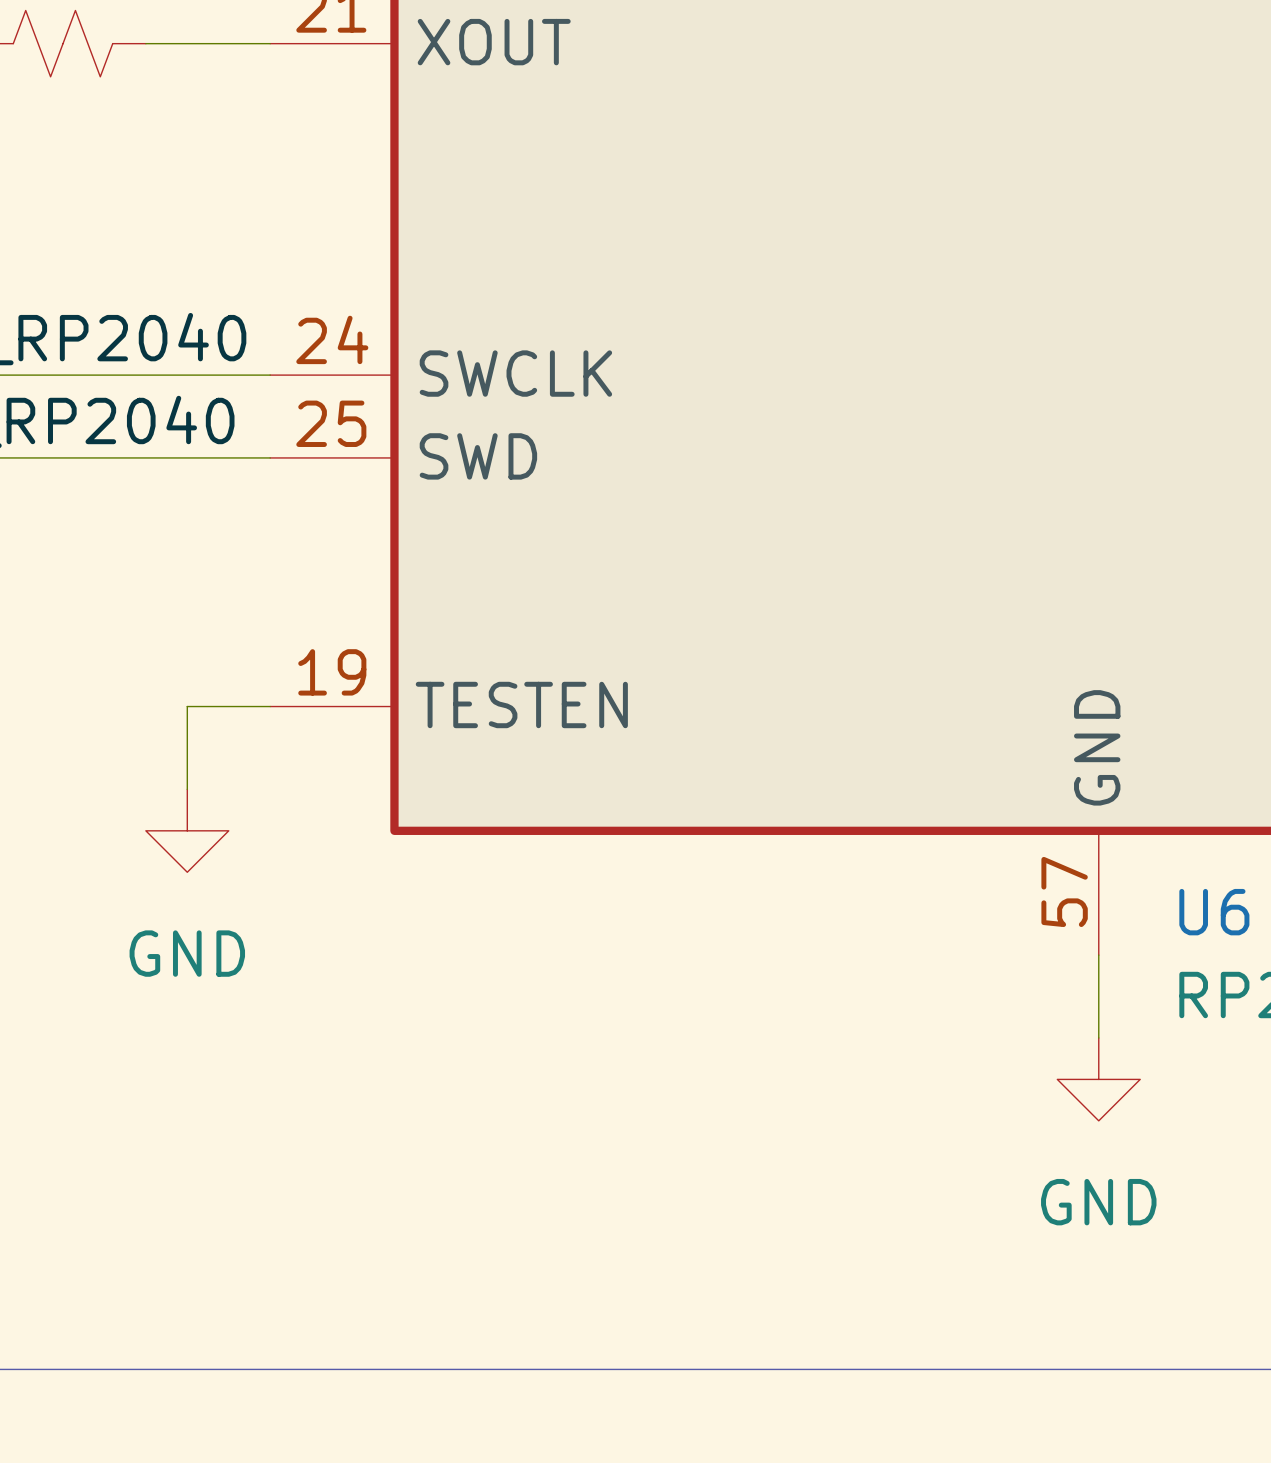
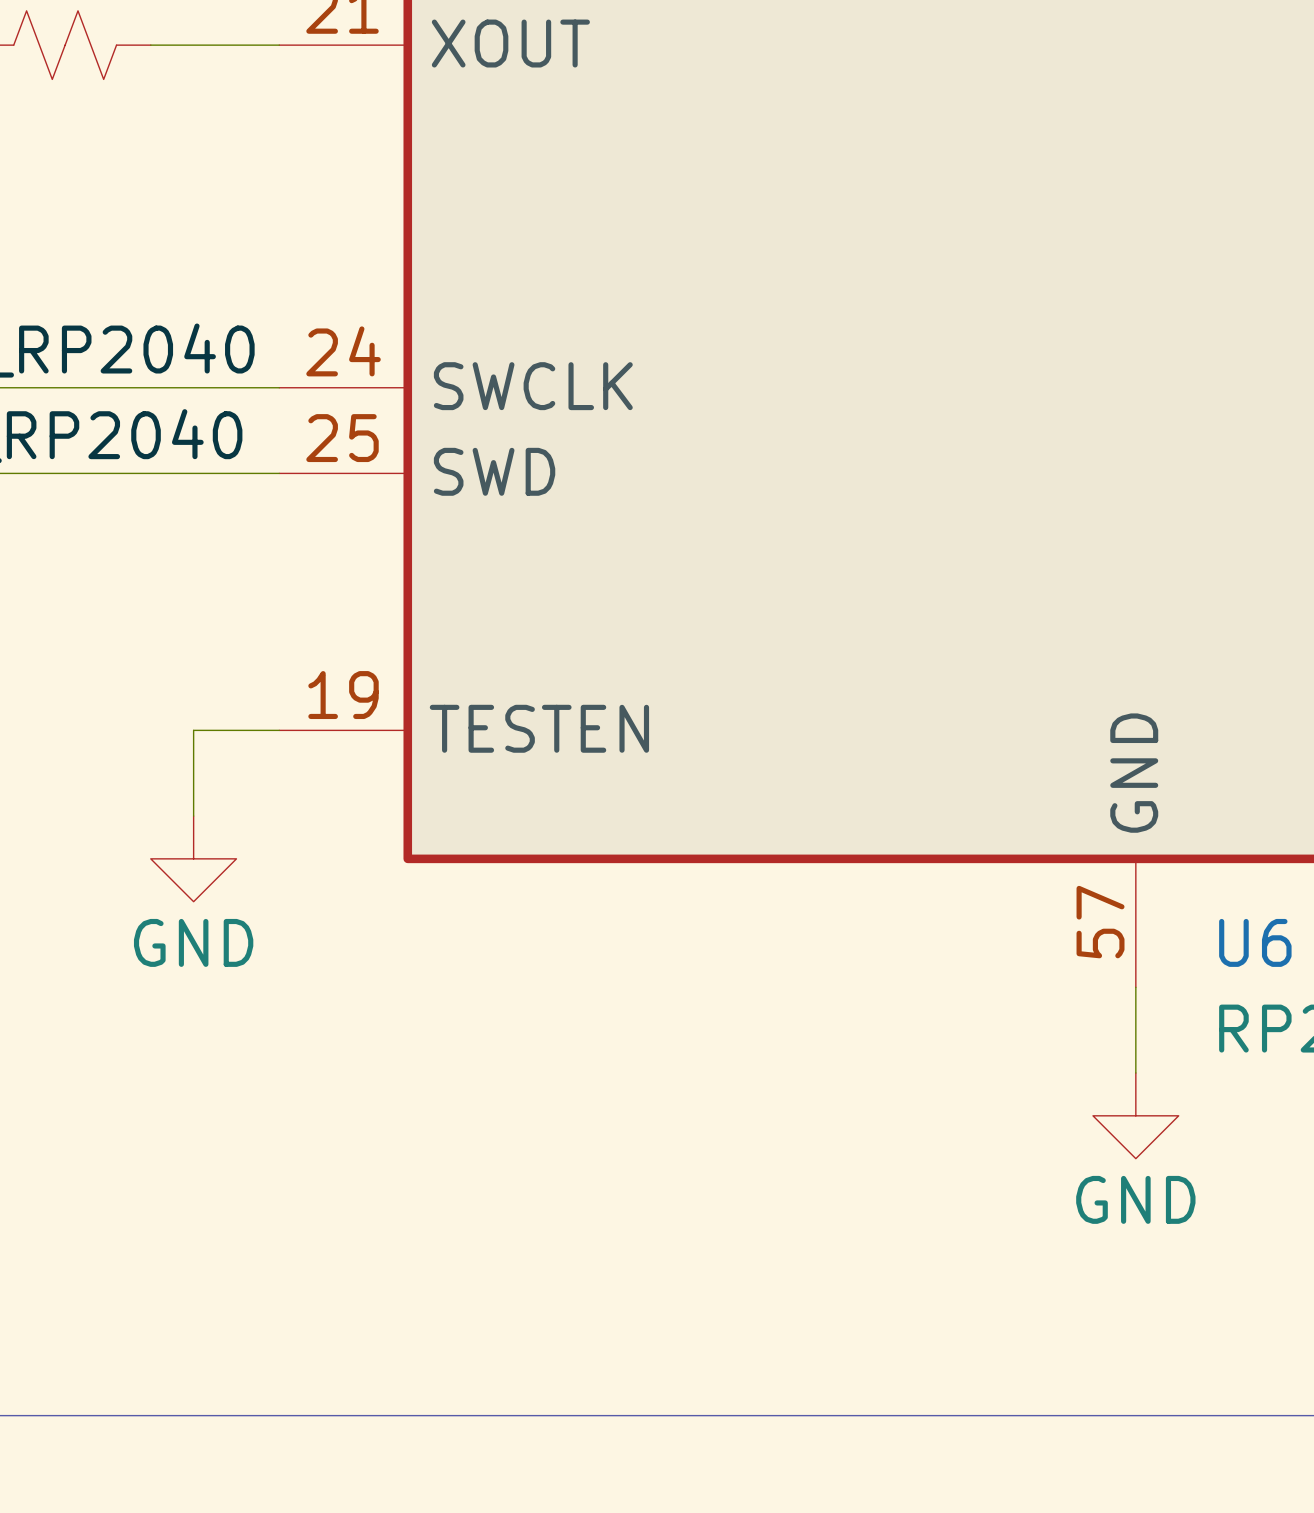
power symbol text position: GND (187, 953) -> GND (193, 942)
power symbol text position: GND (1098, 1202) -> GND (1135, 1199)

